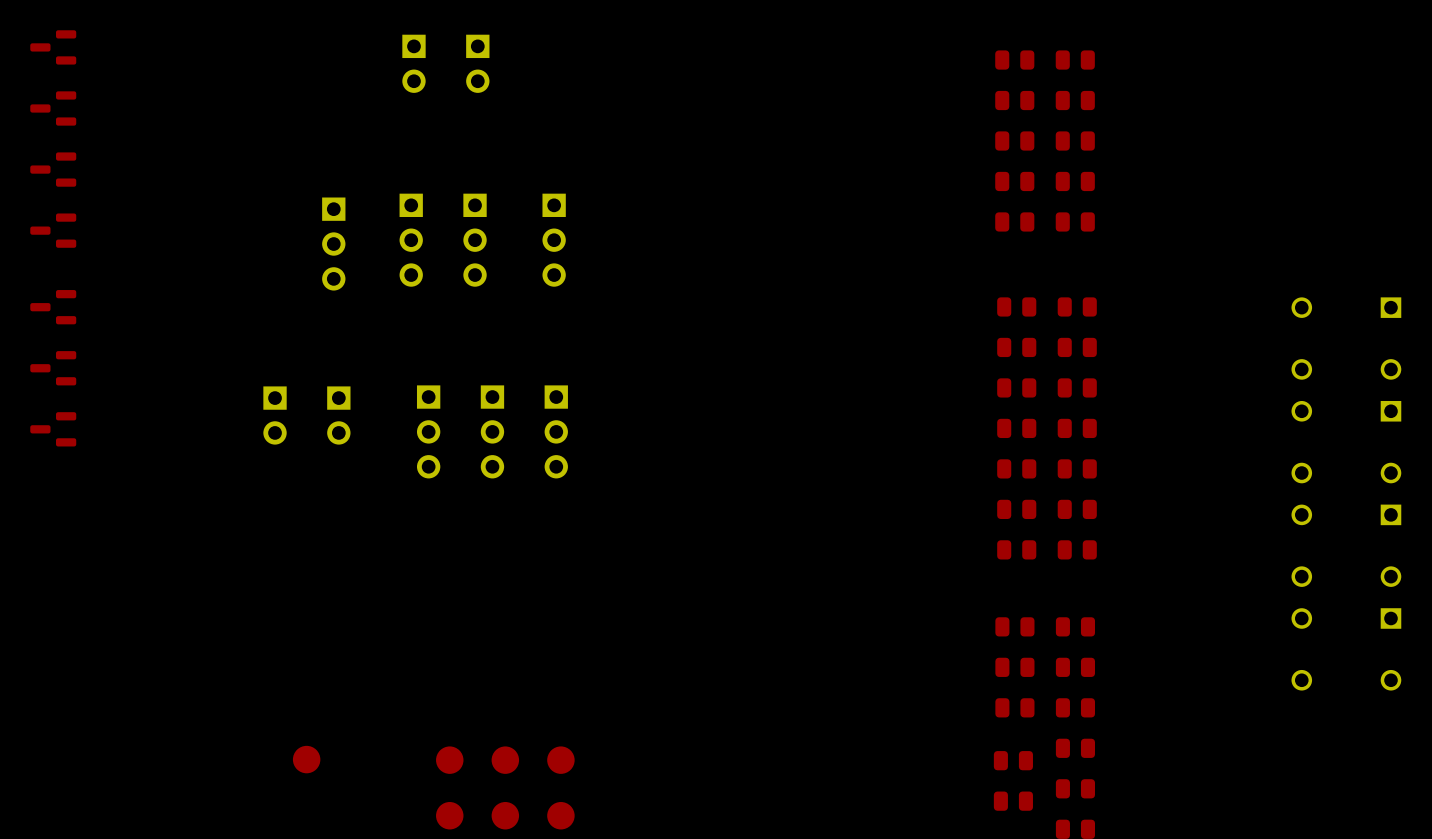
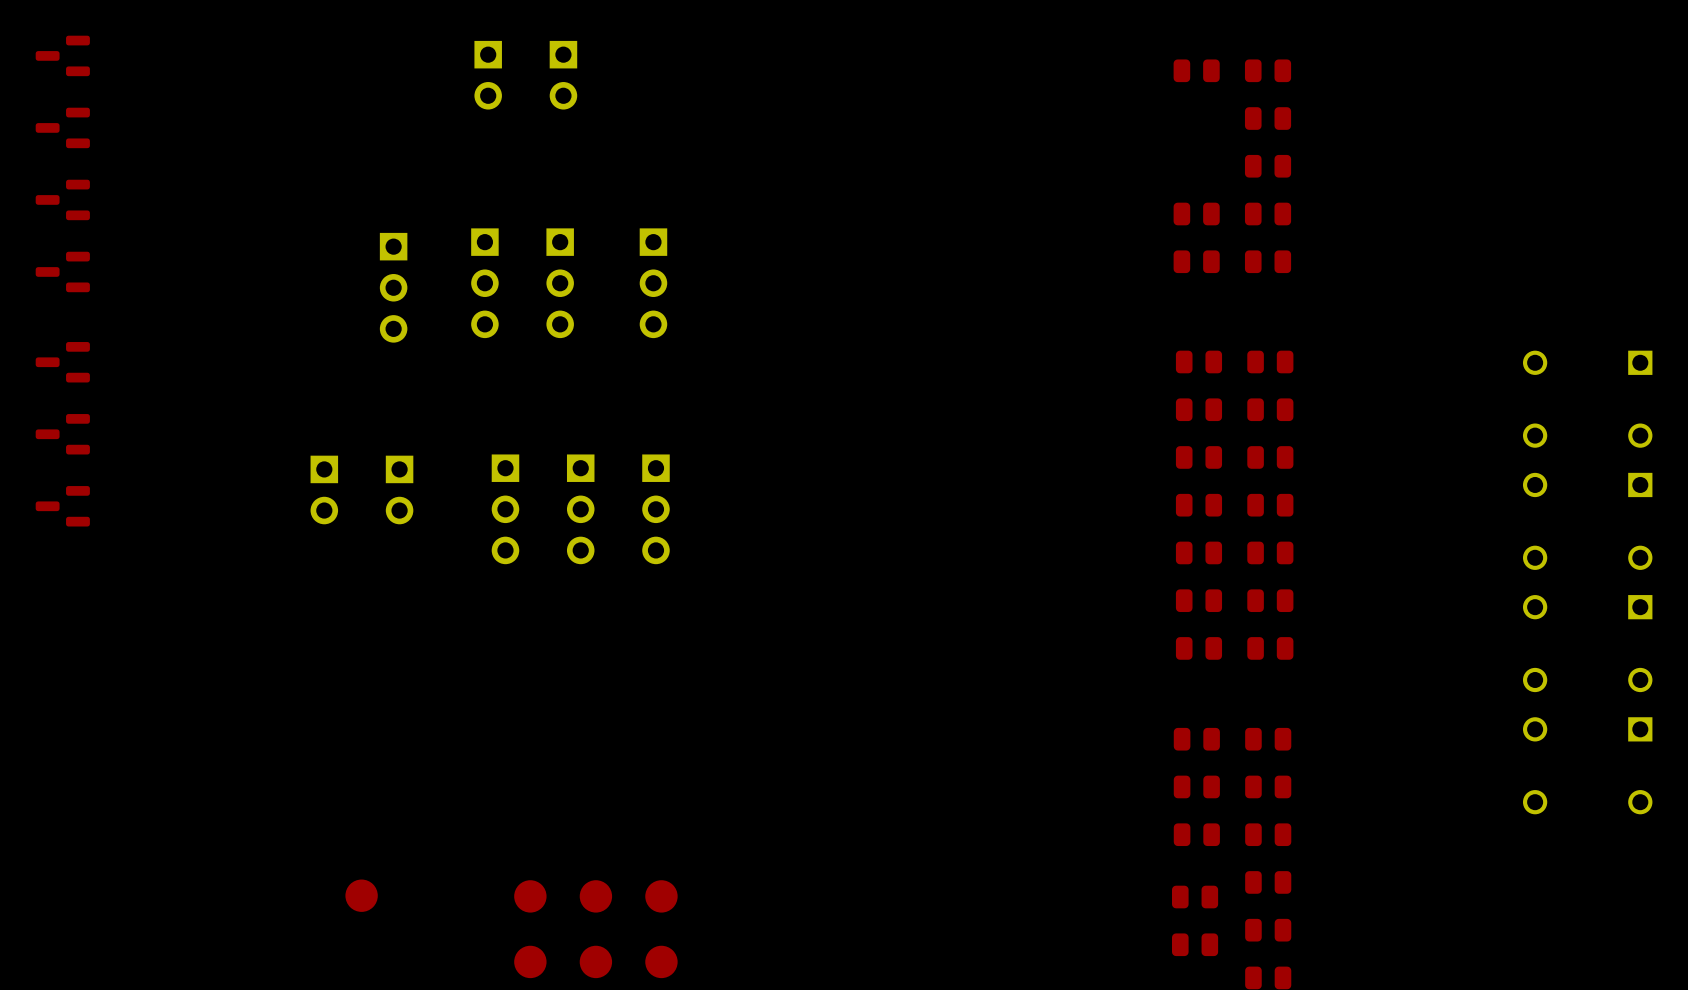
part: (1014, 100) -> none
part: (1014, 140) -> none

